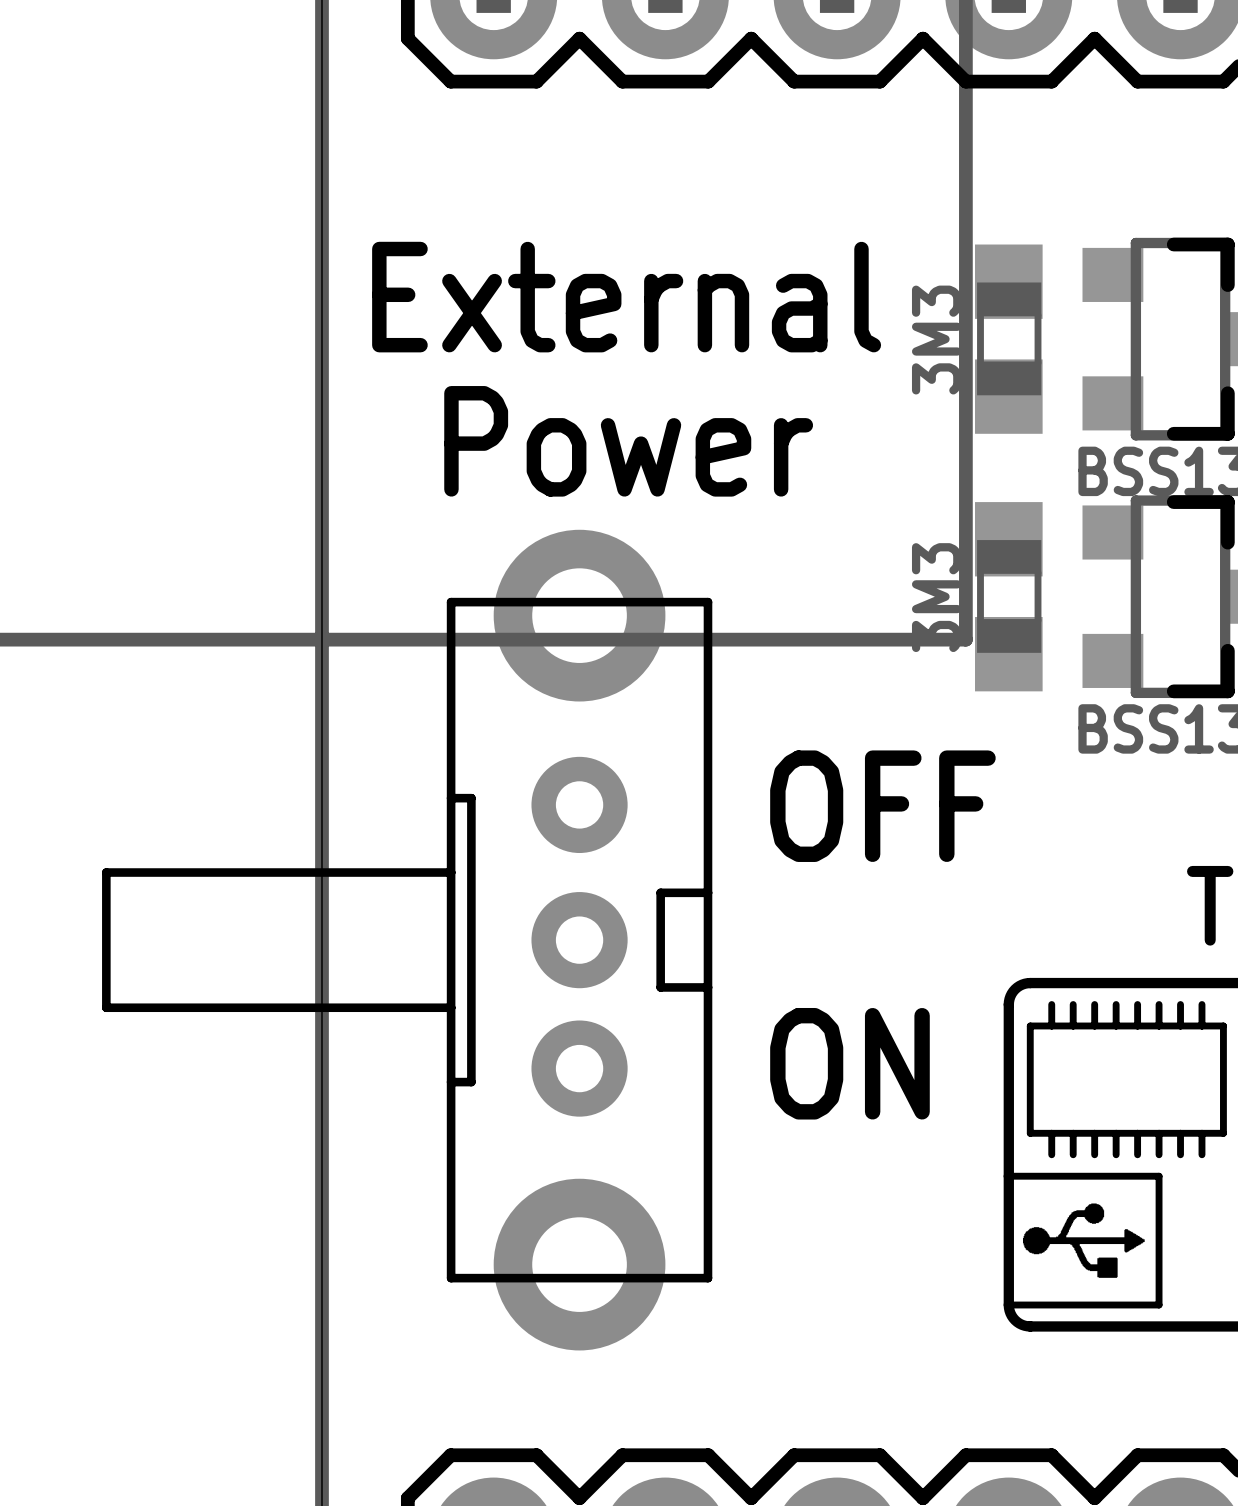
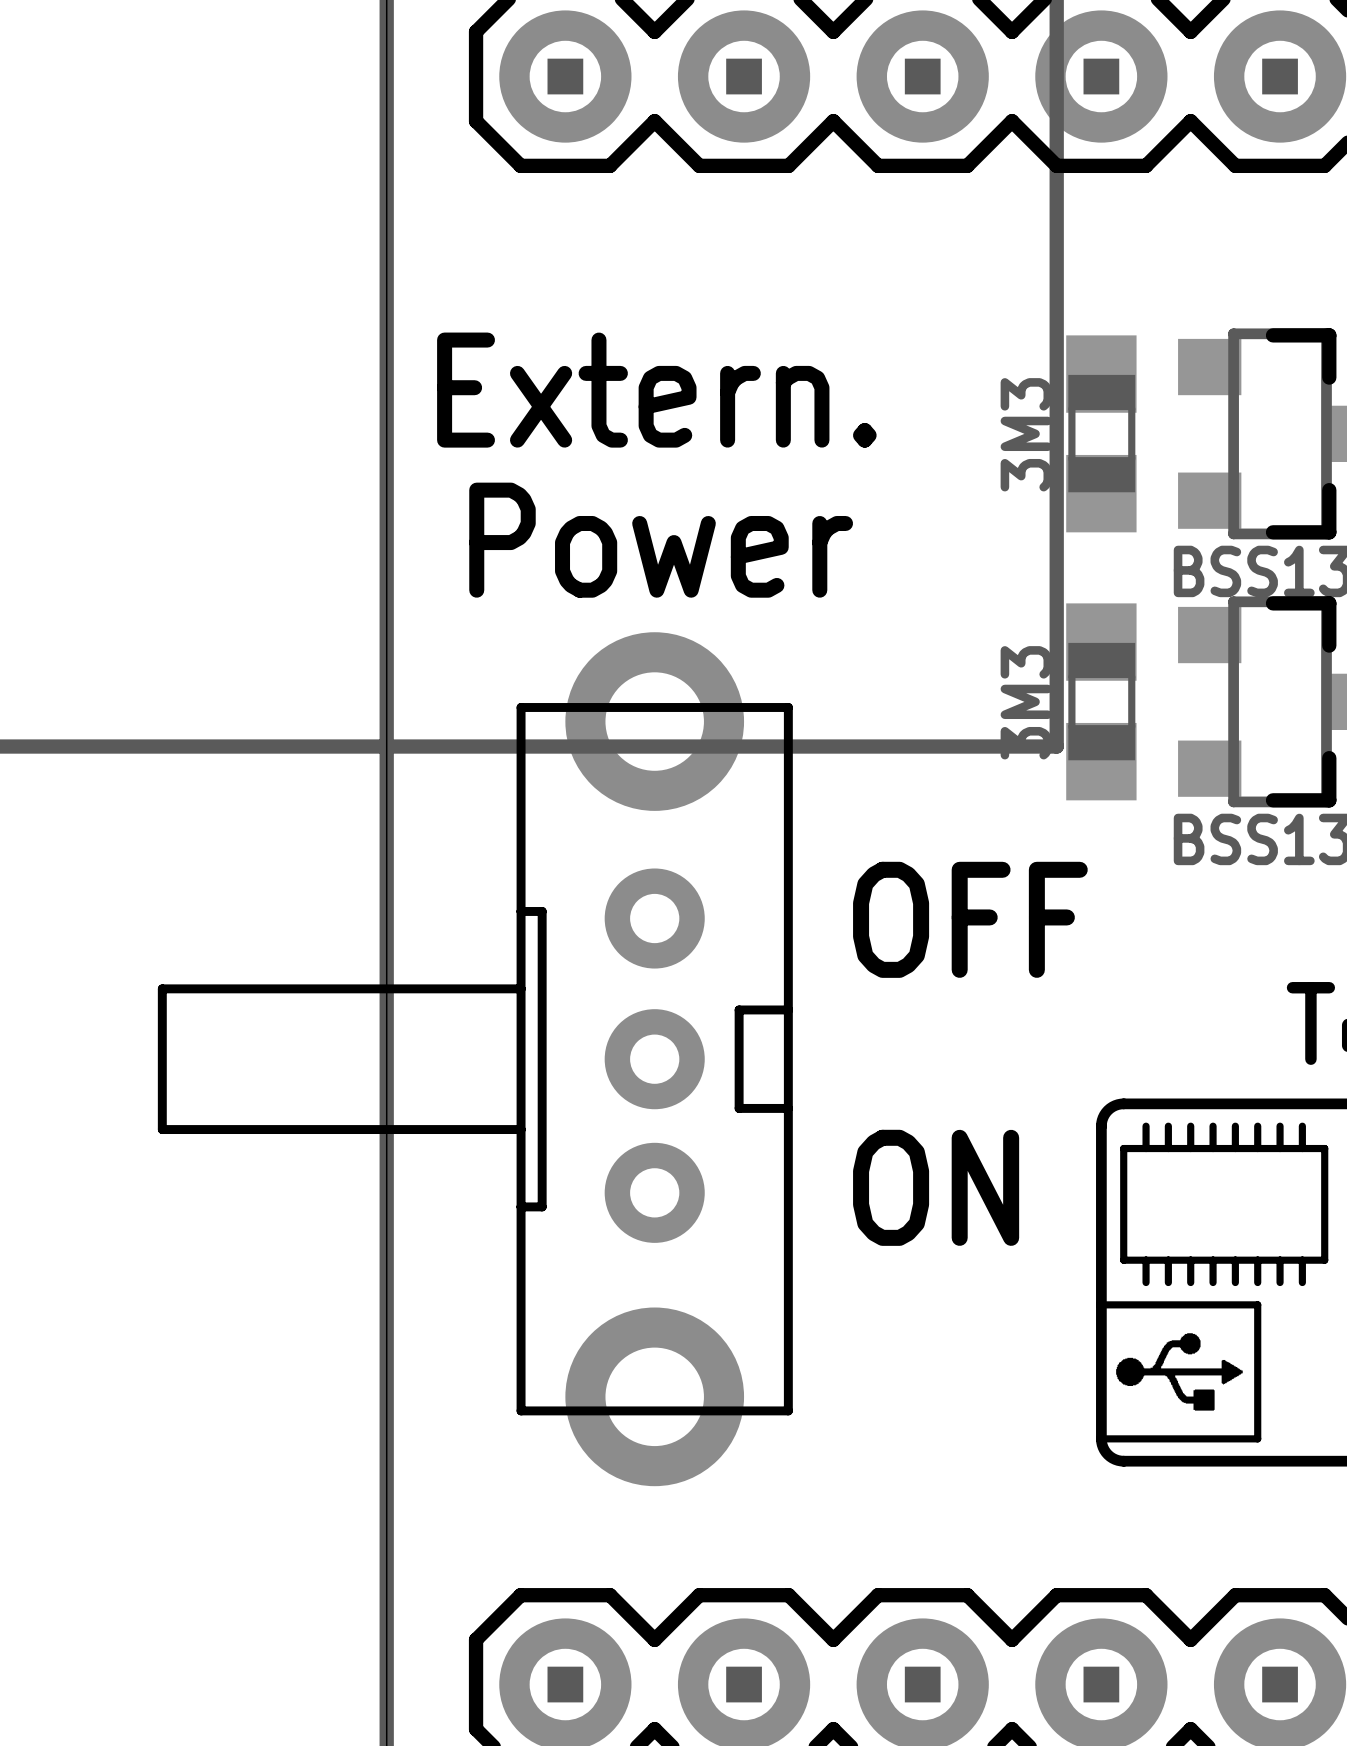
text: External (626, 297) -> Extern. (656, 390)
text position: Power (628, 441) -> Power (661, 540)

